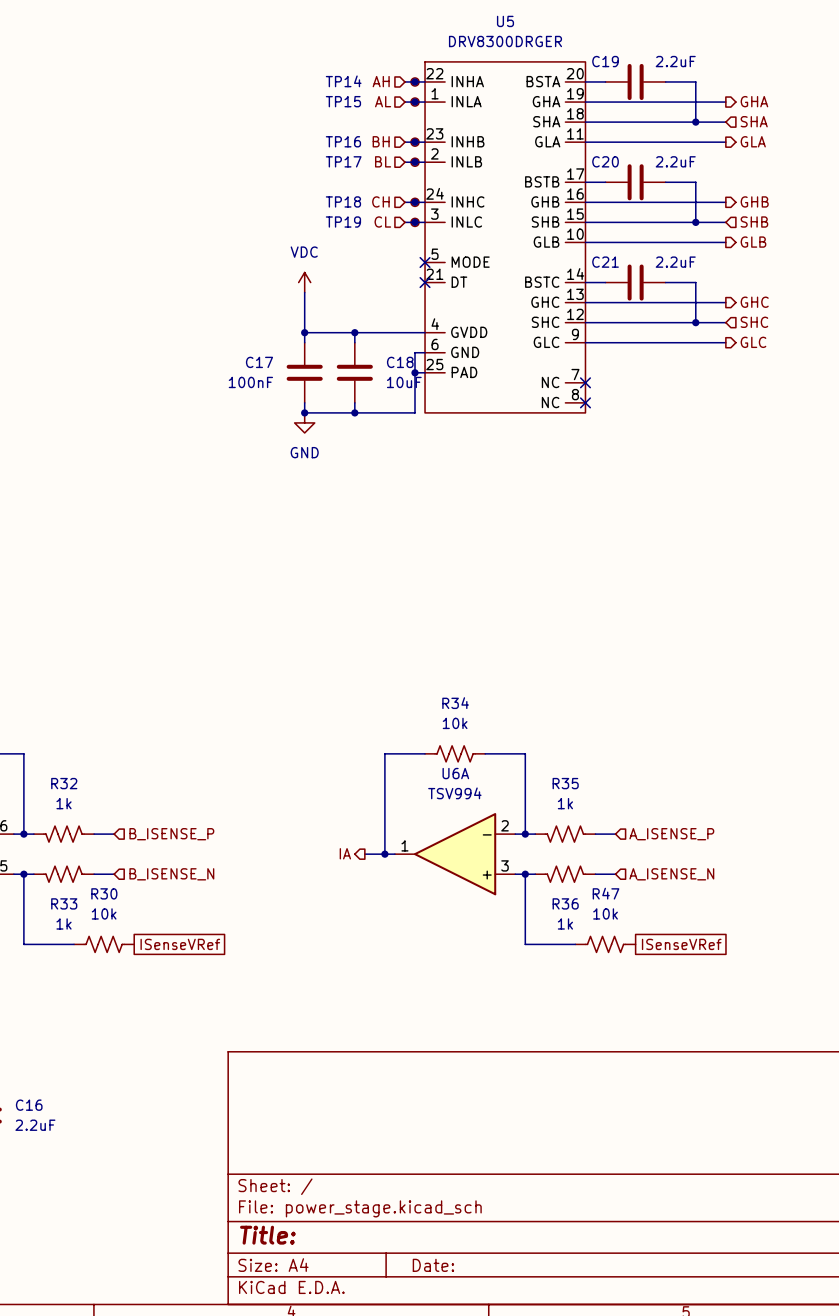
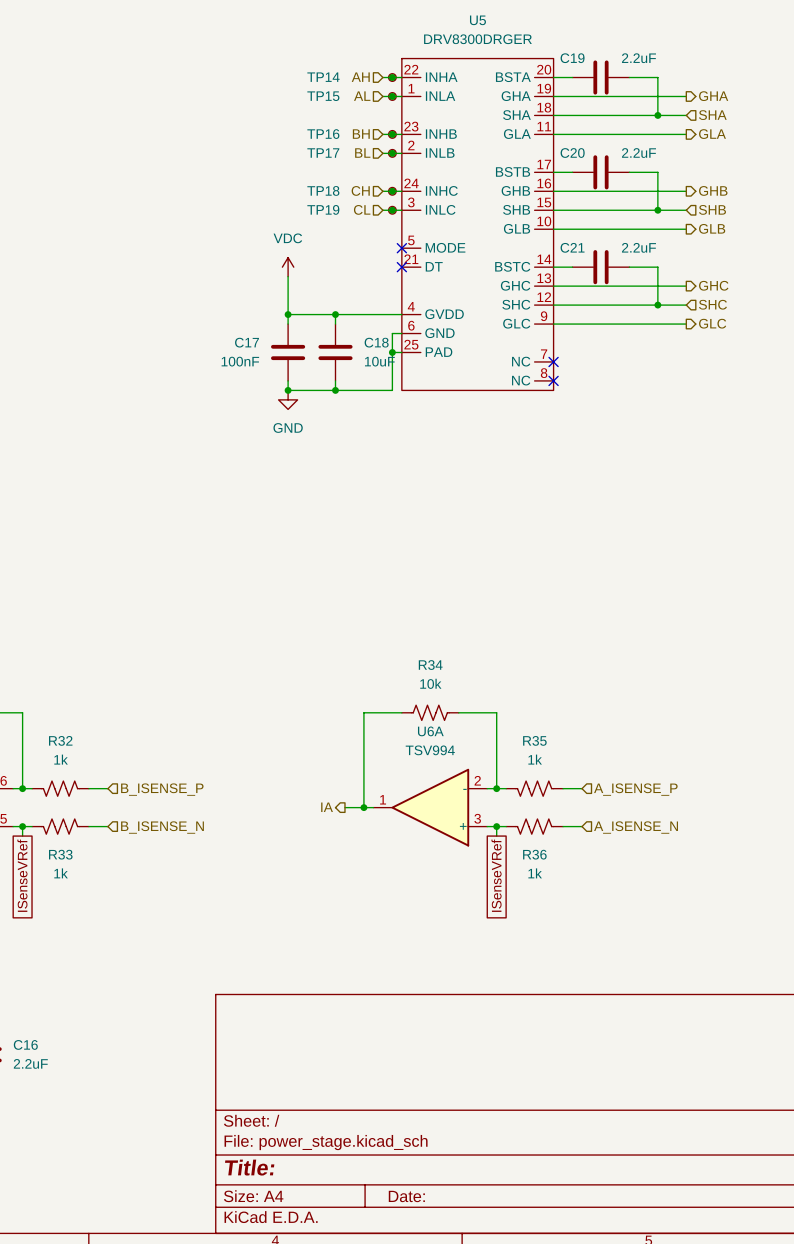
wire: (23, 884) (23, 944) (74, 944) -> none
wire: (525, 884) (525, 944) (575, 944) -> none
R30: 10k (104, 944) -> none
global label rotation: 0° (180, 944) -> 90° clockwise (22, 875)
global label position: ISenseVRef (180, 944) -> ISenseVRef (22, 875)
R47: 10k (605, 944) -> none
global label rotation: 0° (681, 944) -> 90° clockwise (496, 875)
global label position: ISenseVRef (681, 944) -> ISenseVRef (496, 875)

